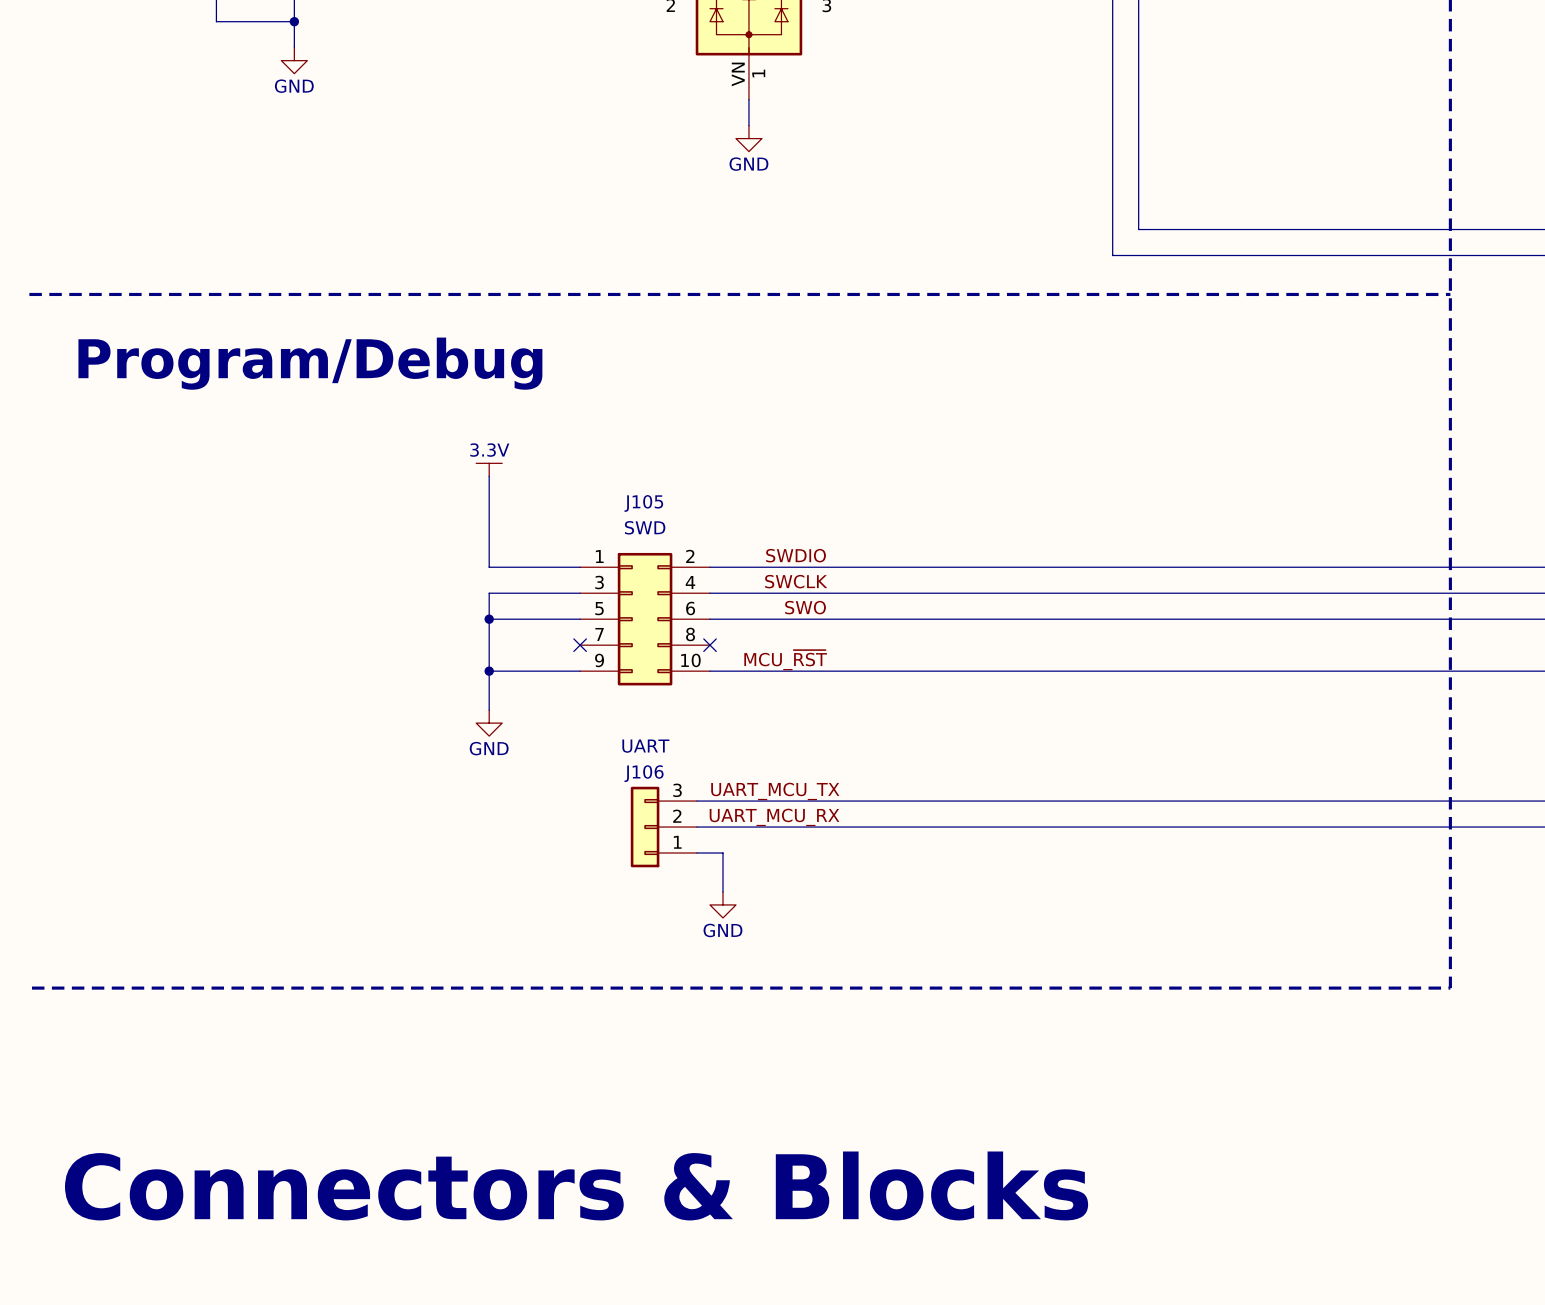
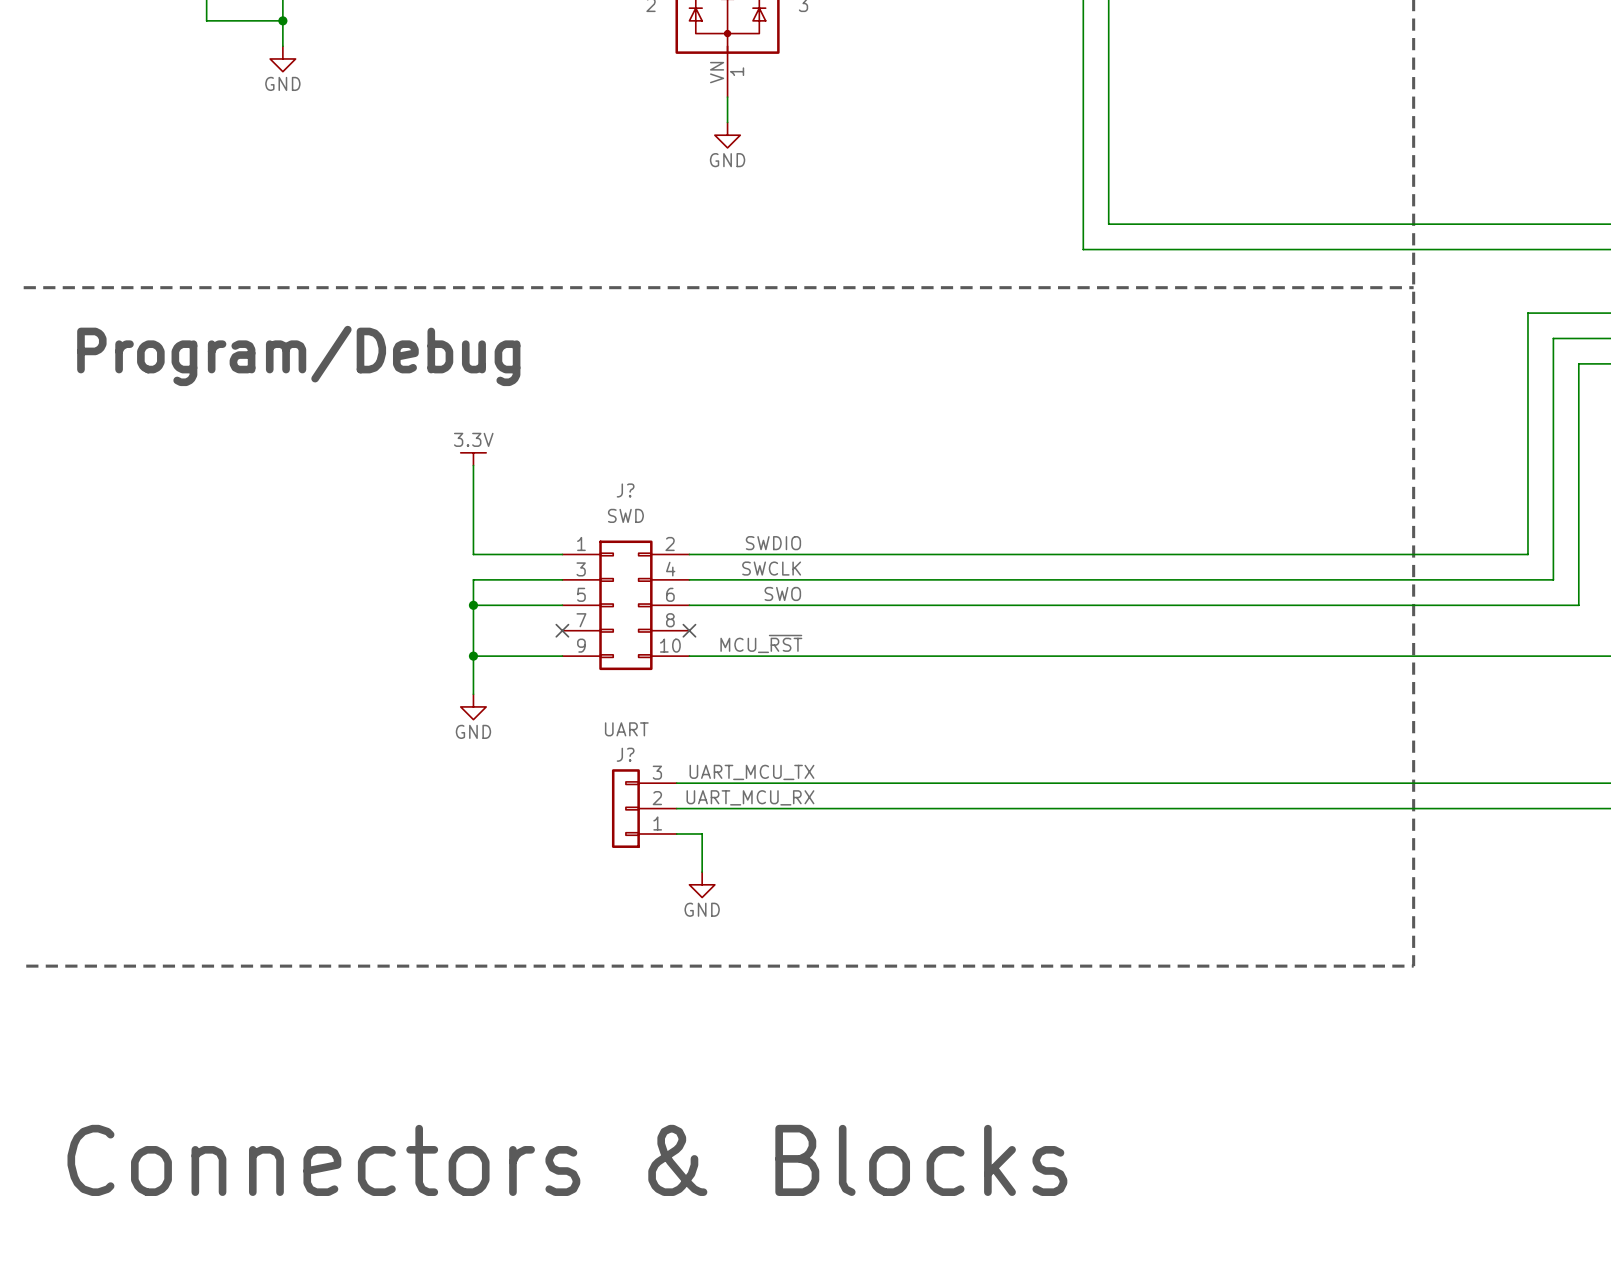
J105 name: J105 (643, 503) -> J? (625, 490)
J106 name: J106 (644, 773) -> J? (625, 754)

